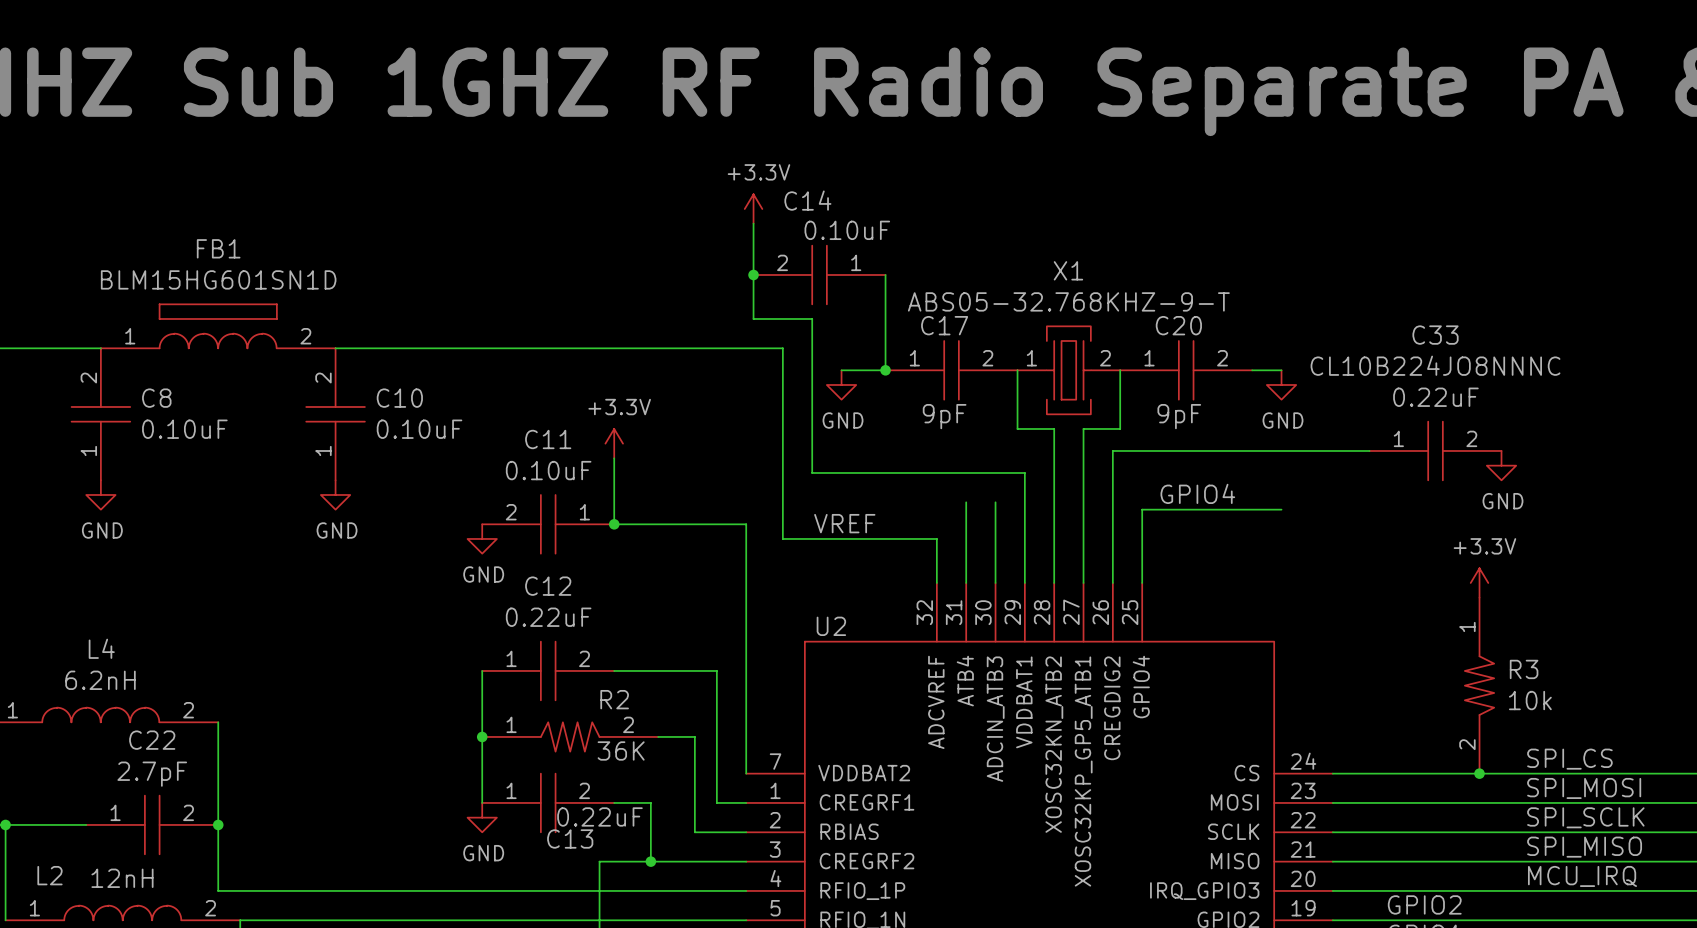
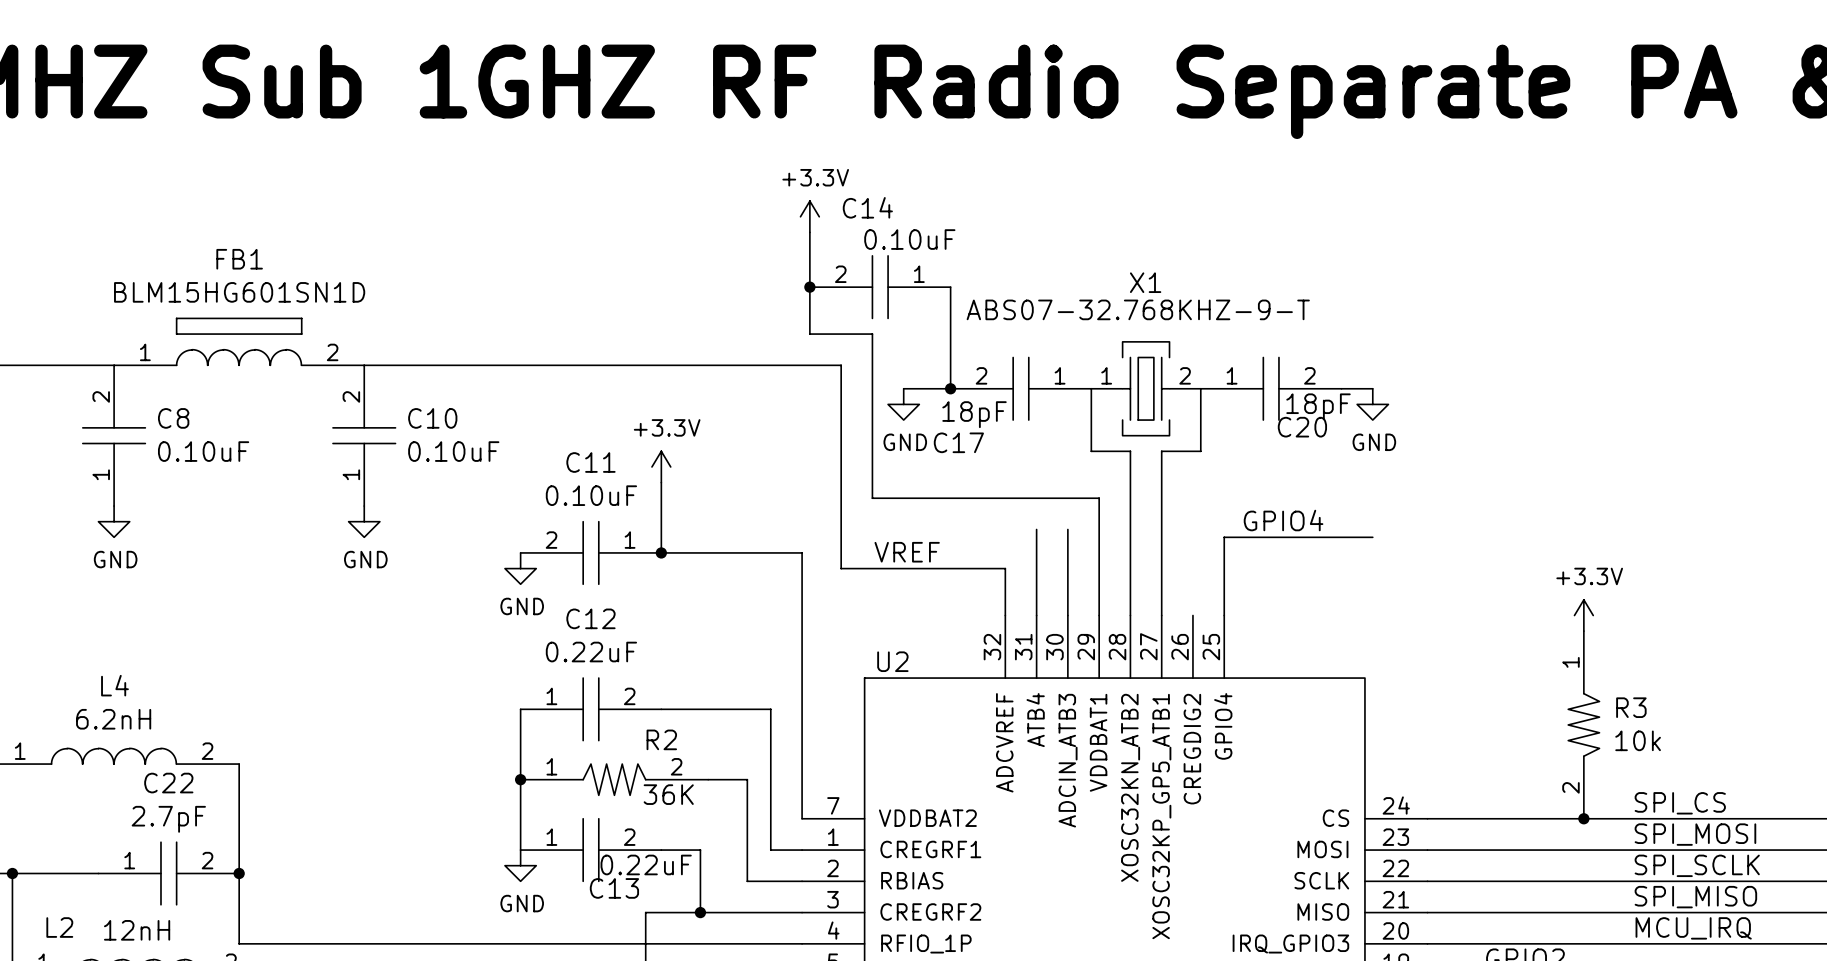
X1 value: ABS05-32.768KHZ-9-T (1068, 301) -> ABS07-32.768KHZ-9-T (1138, 309)
C17 name position: C17 (944, 325) -> C17 (958, 442)
C20 name position: C20 (1178, 325) -> C20 (1302, 427)
C17 rotation: 0° (951, 370) -> 180° (1020, 388)
C17 text: 9pF (944, 416) -> 18pF (974, 414)
C20 text: 9pF (1179, 416) -> 18pF (1318, 406)
wire: (1369, 450) (1112, 450) (1112, 582) -> none
C33: CL10B224JO8NNNC (1435, 450) -> none
power symbol: GND (1501, 465) -> none

